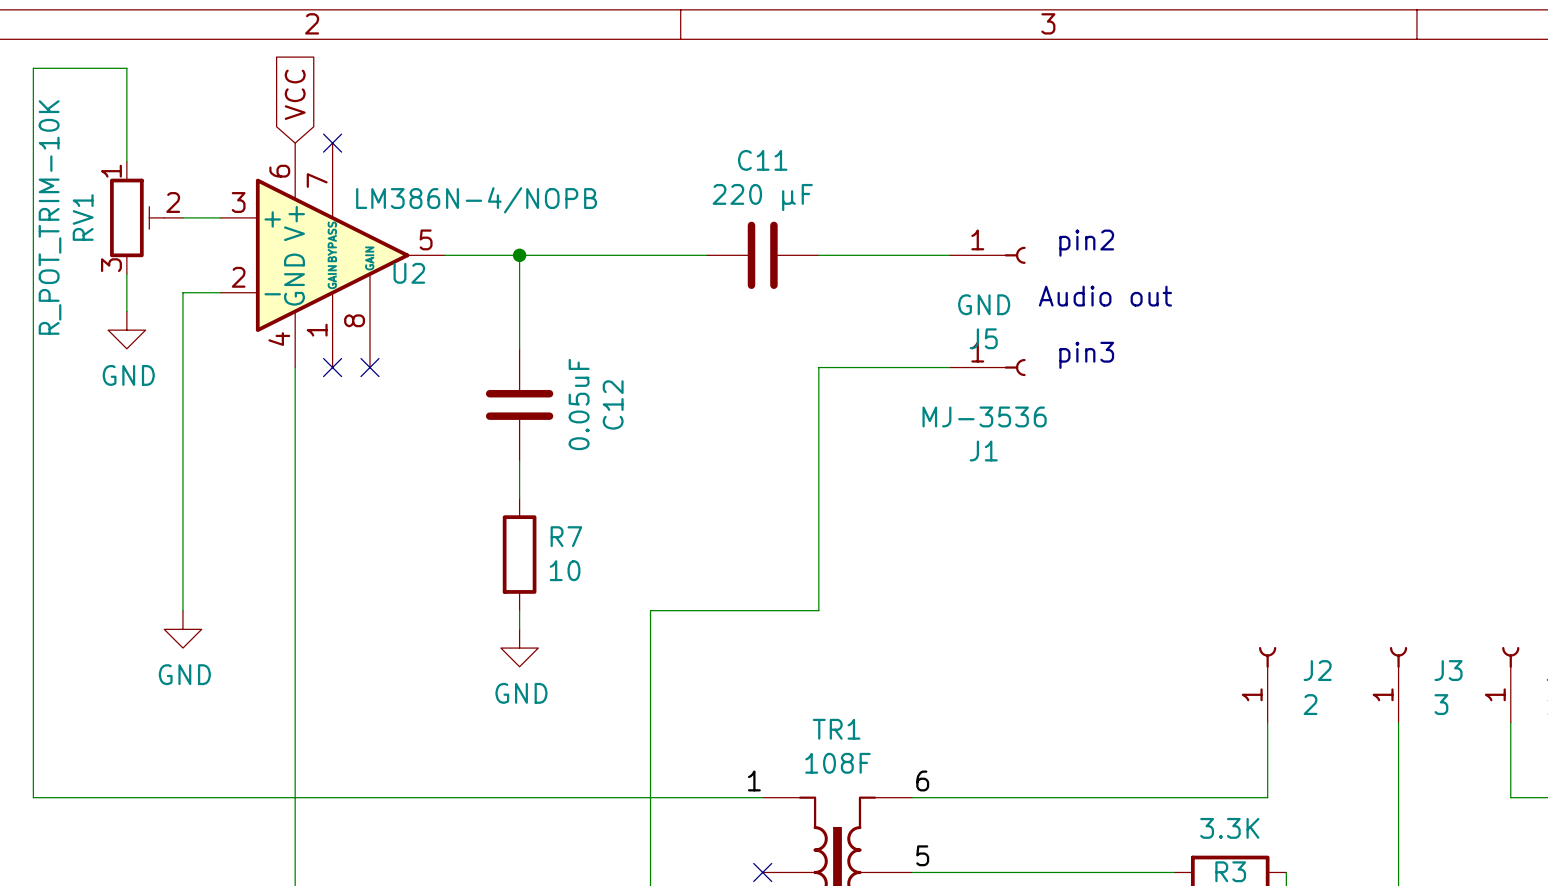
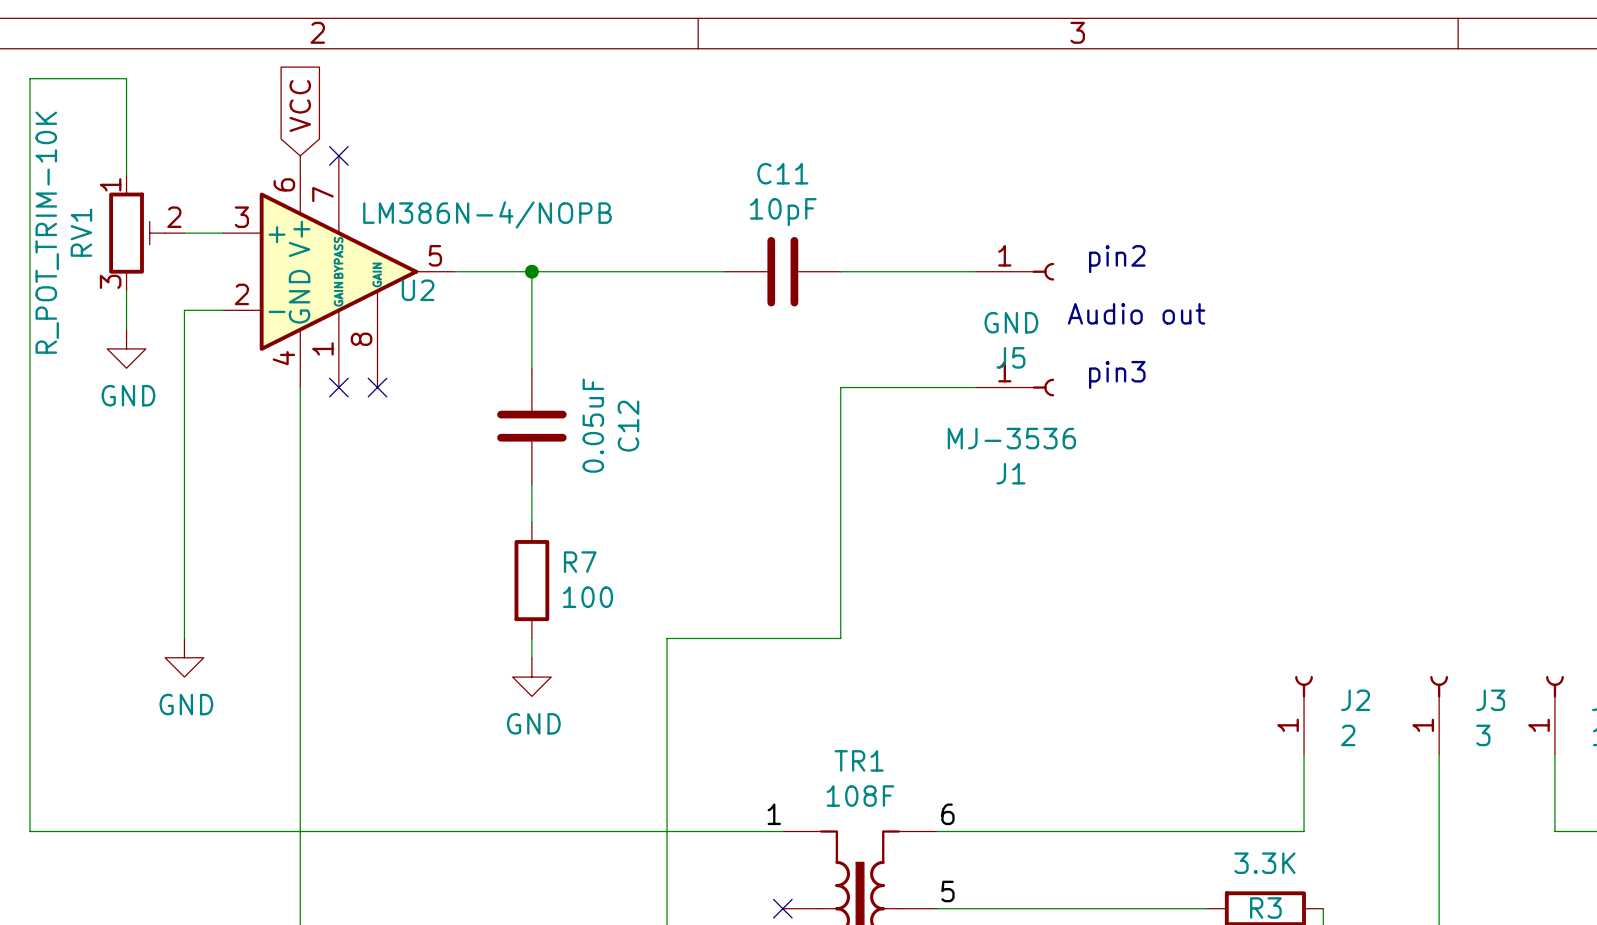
C11 value: 220 µF (762, 197) -> 10pF (783, 212)
R7 value: 10 (565, 570) -> 100 (588, 597)

